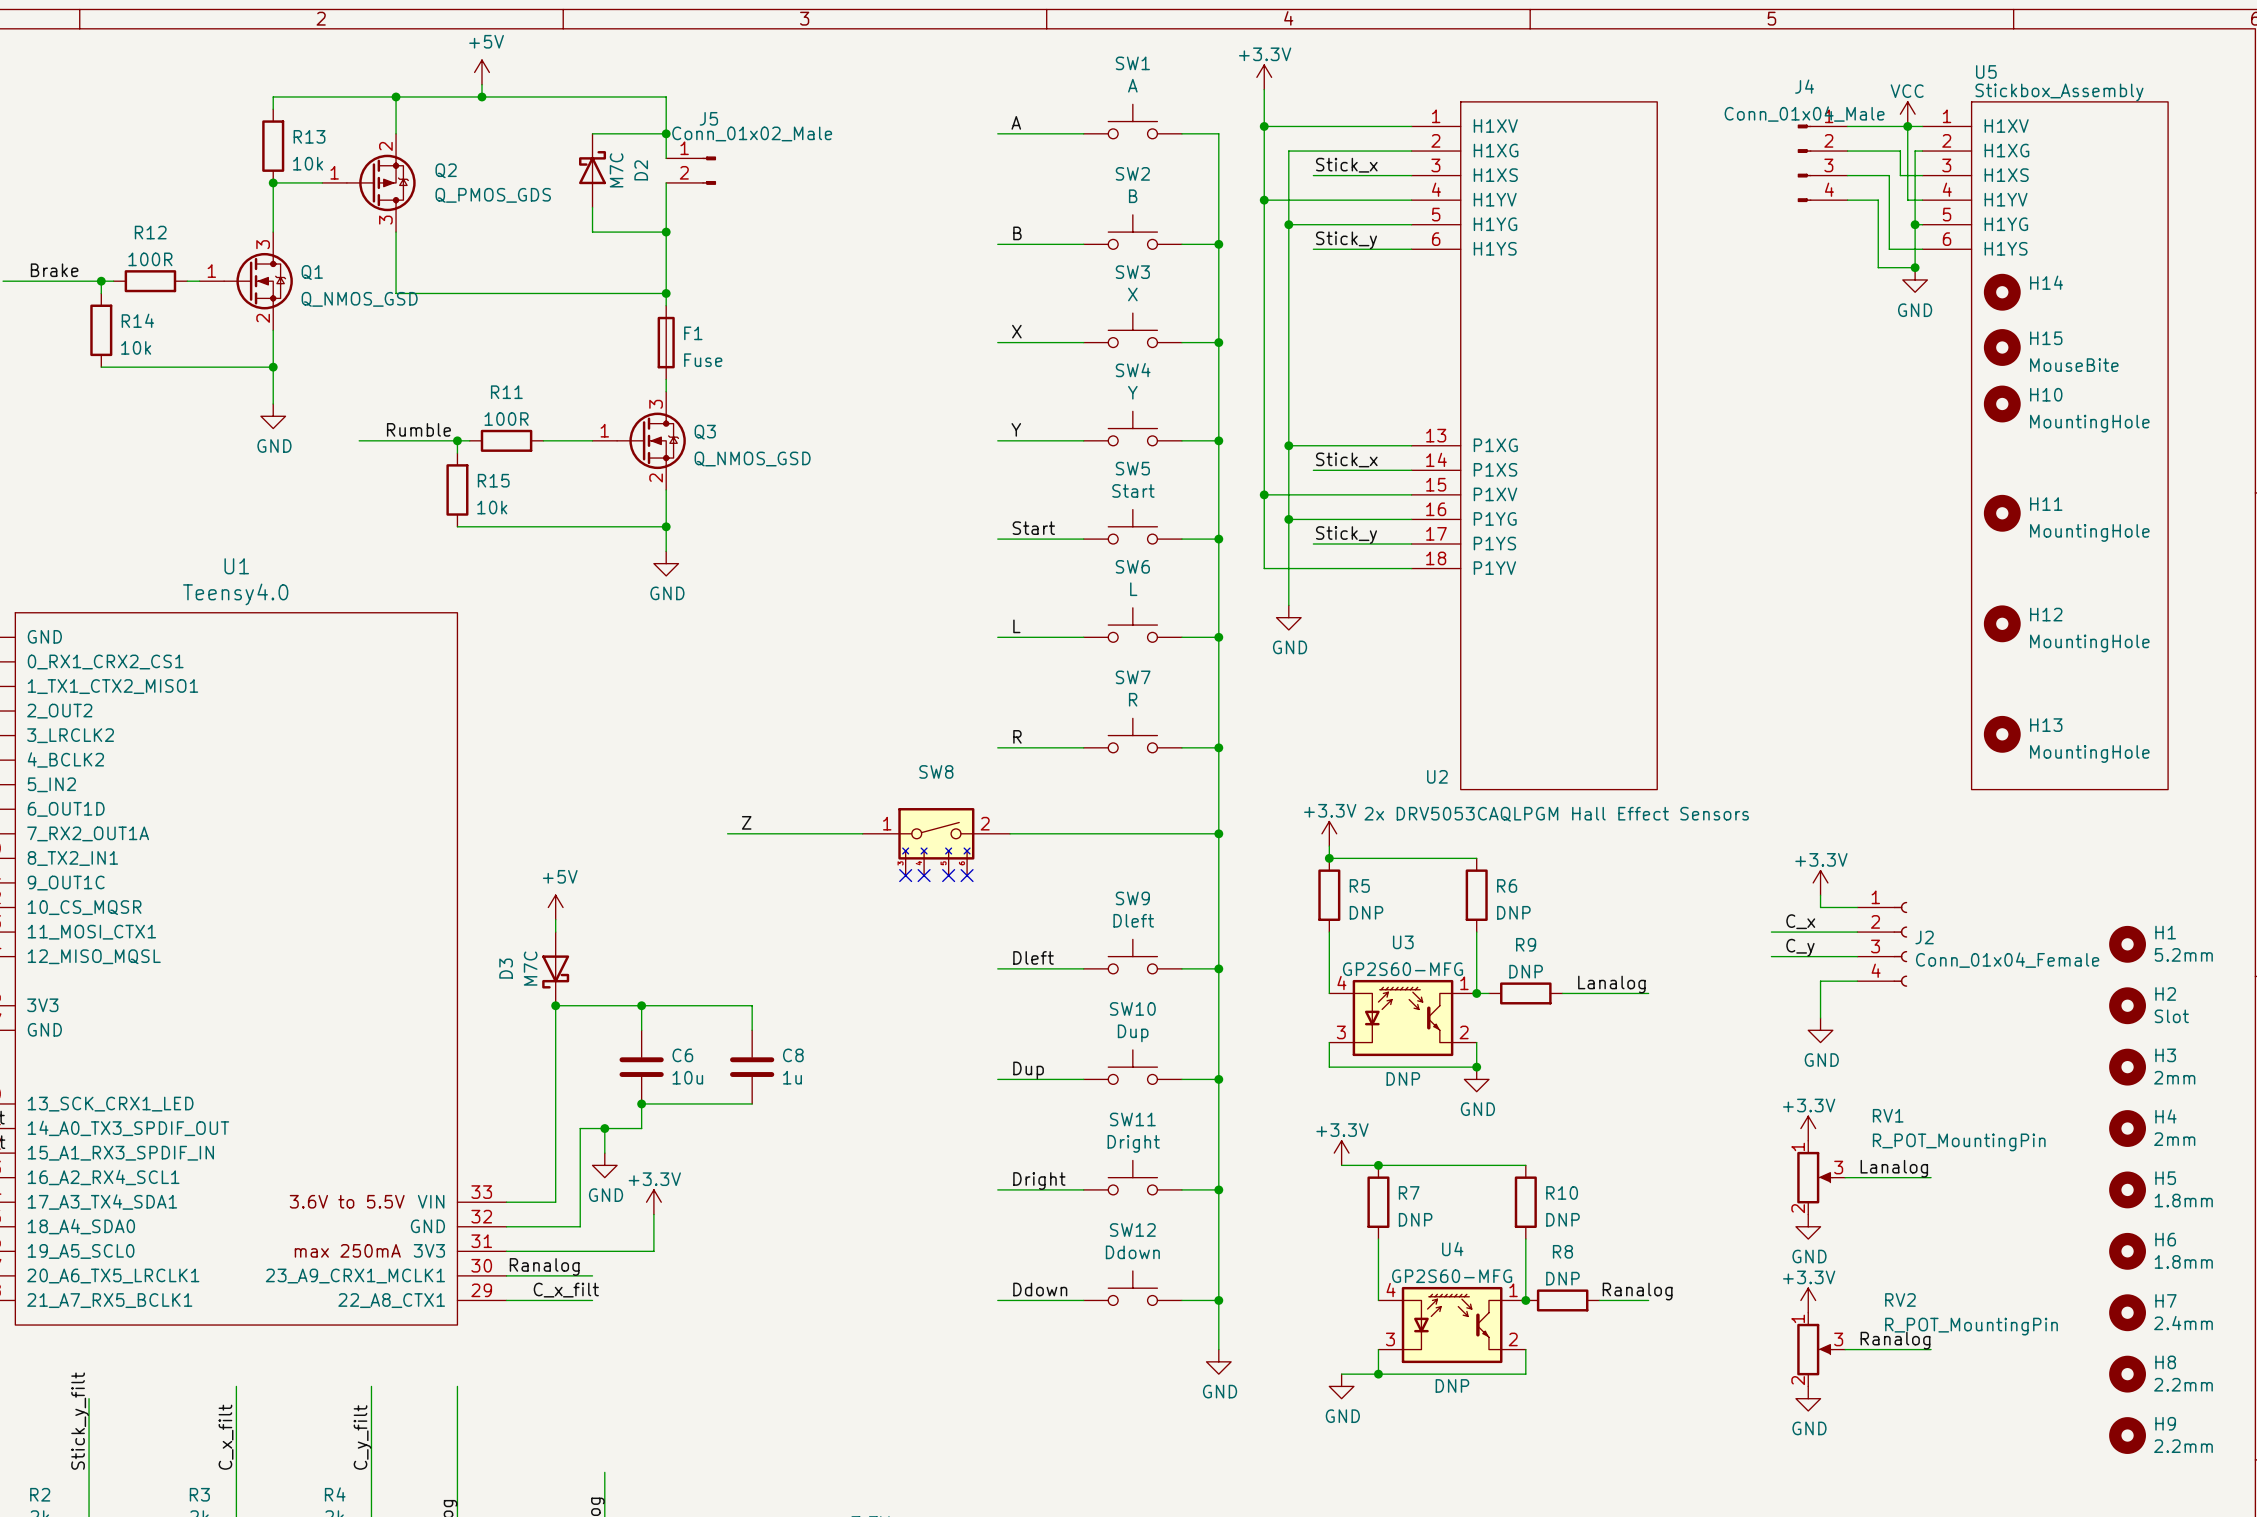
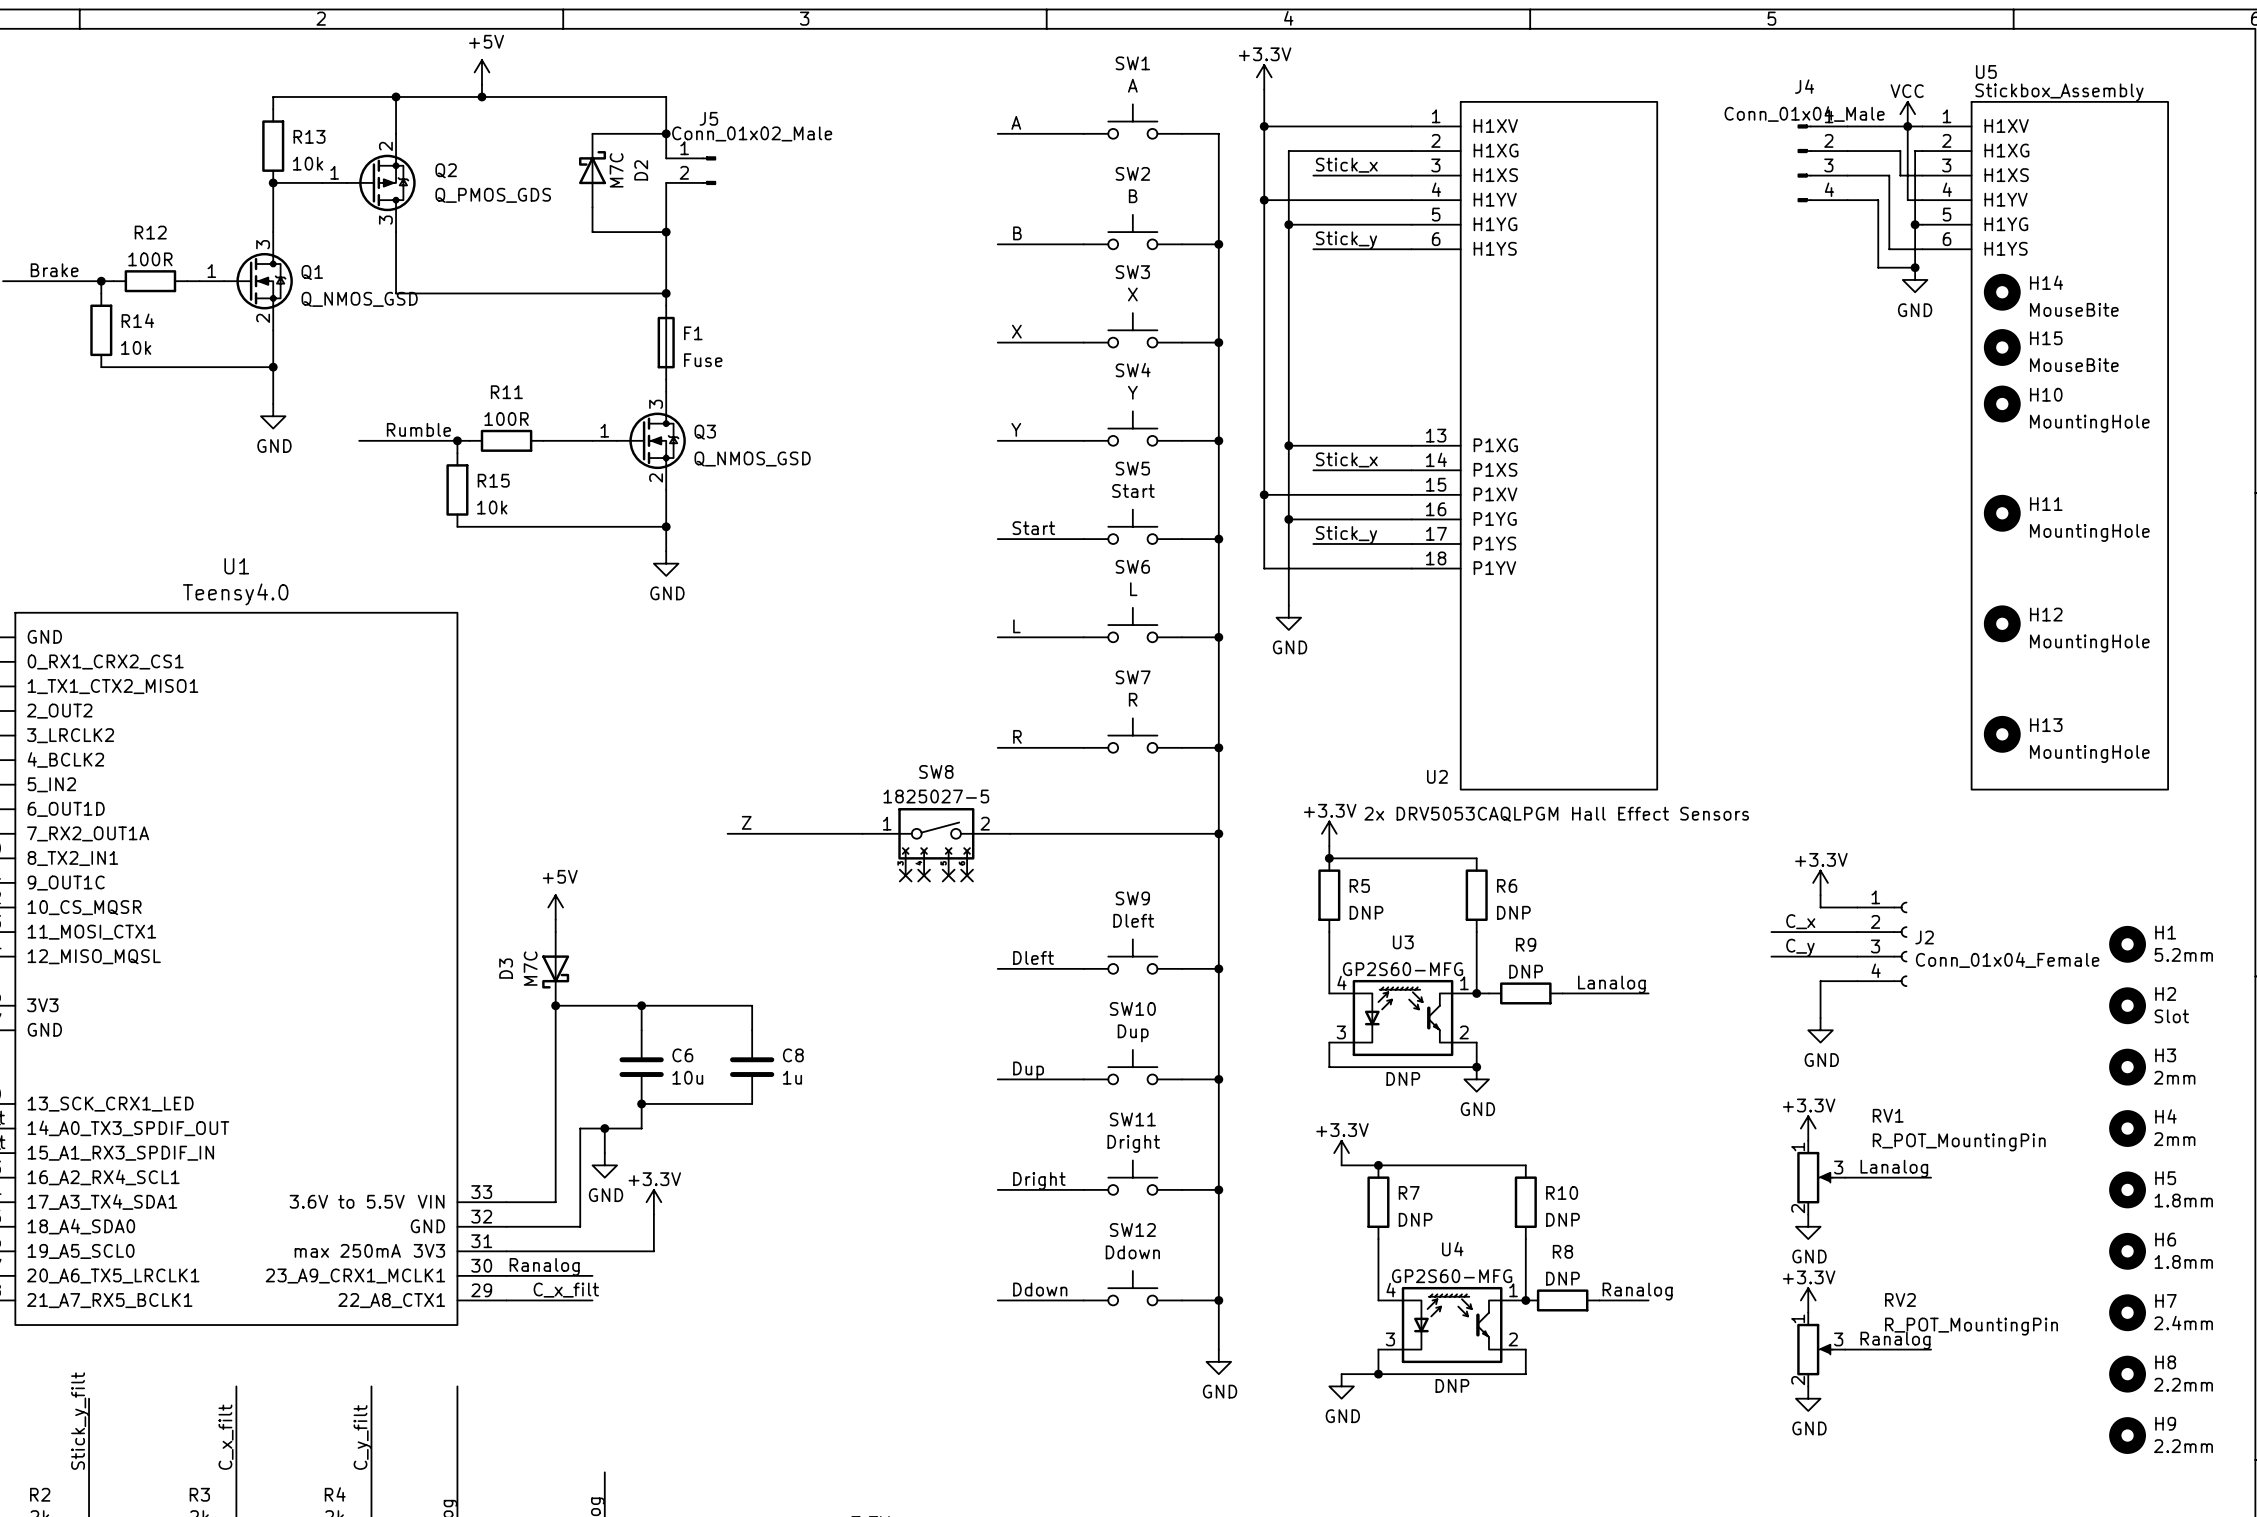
H14 value: none -> MouseBite (2074, 309)
SW8 value: none -> 1825027-5 (936, 796)

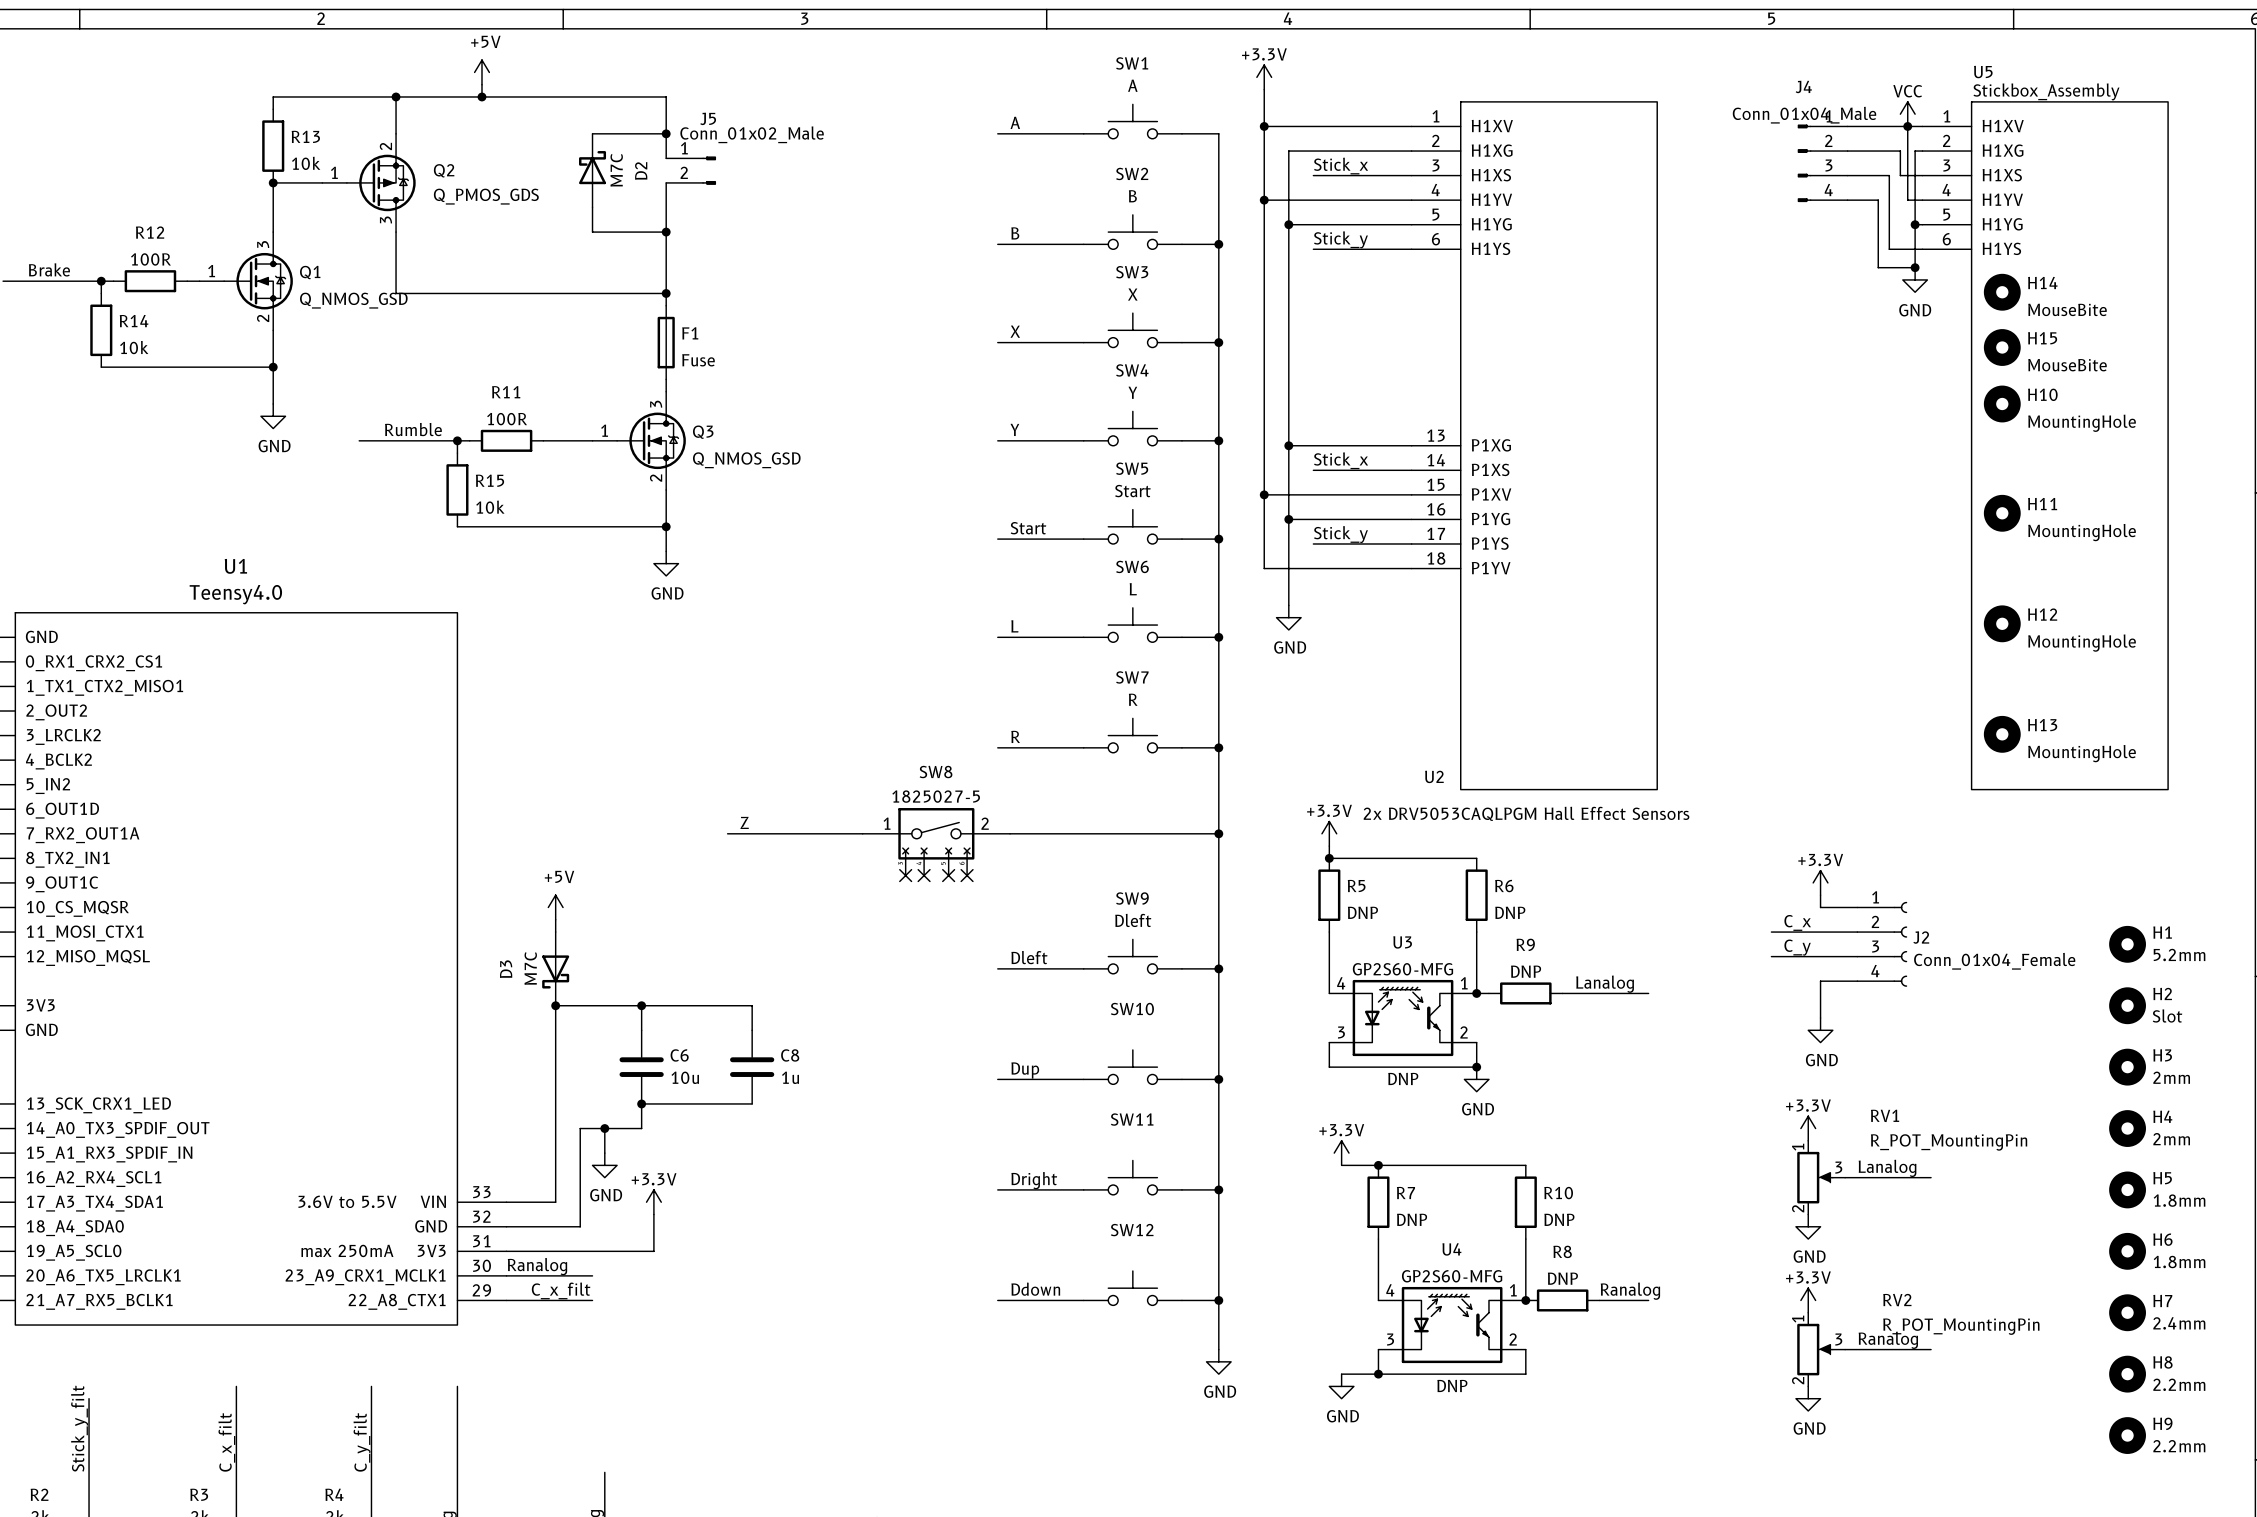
SW10 value: Dup (1133, 1033) -> none
SW11 value: Dright (1133, 1143) -> none
SW12 value: Ddown (1132, 1252) -> none

